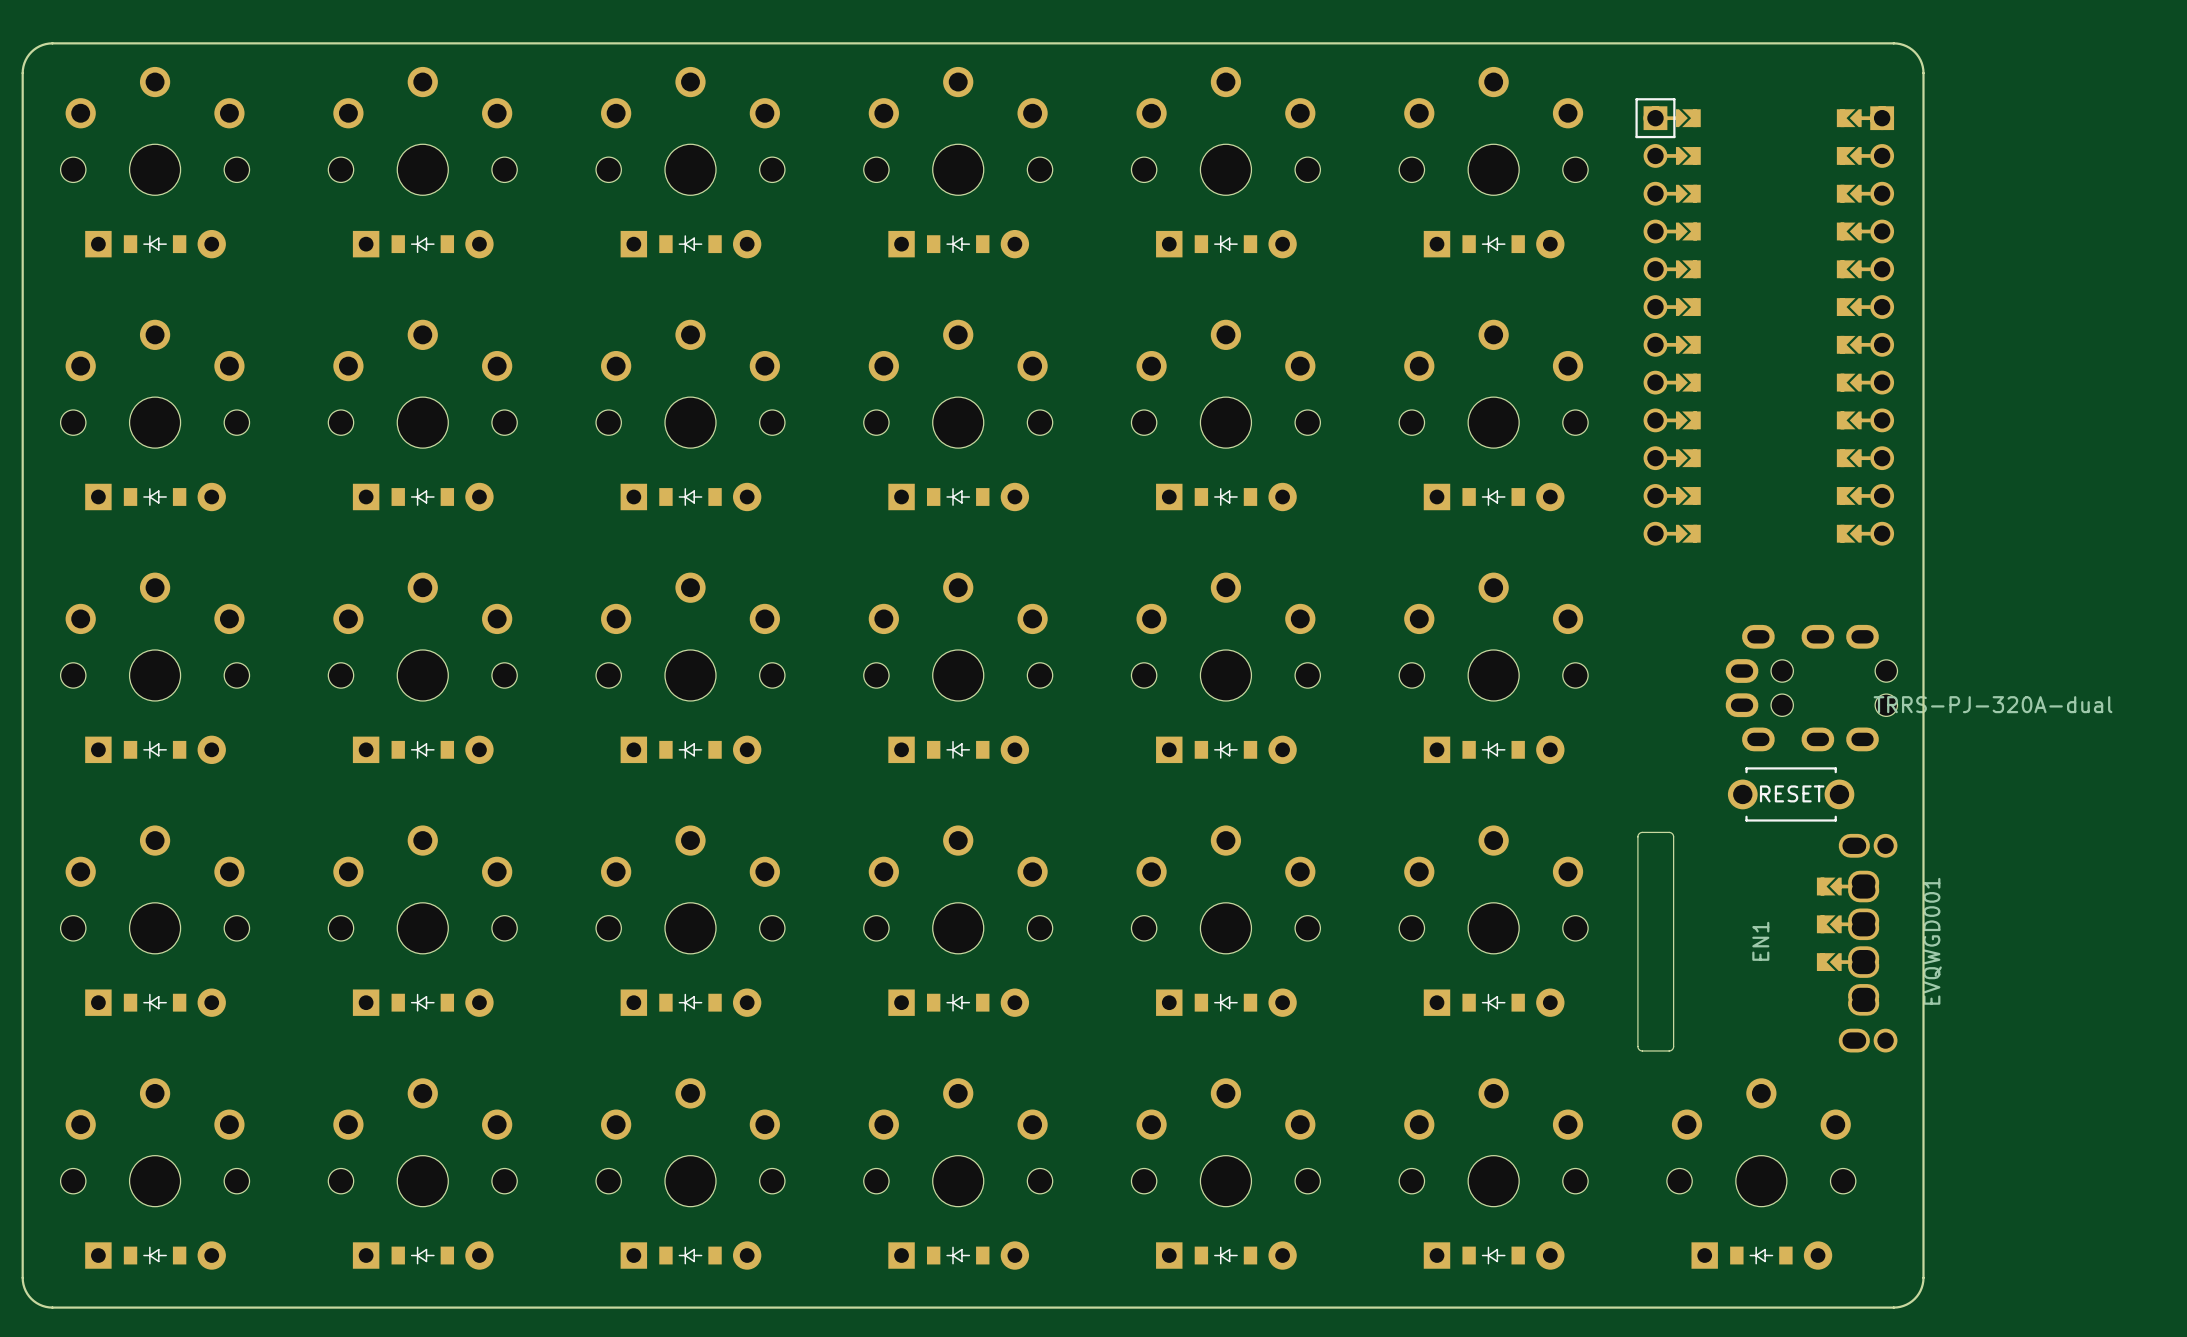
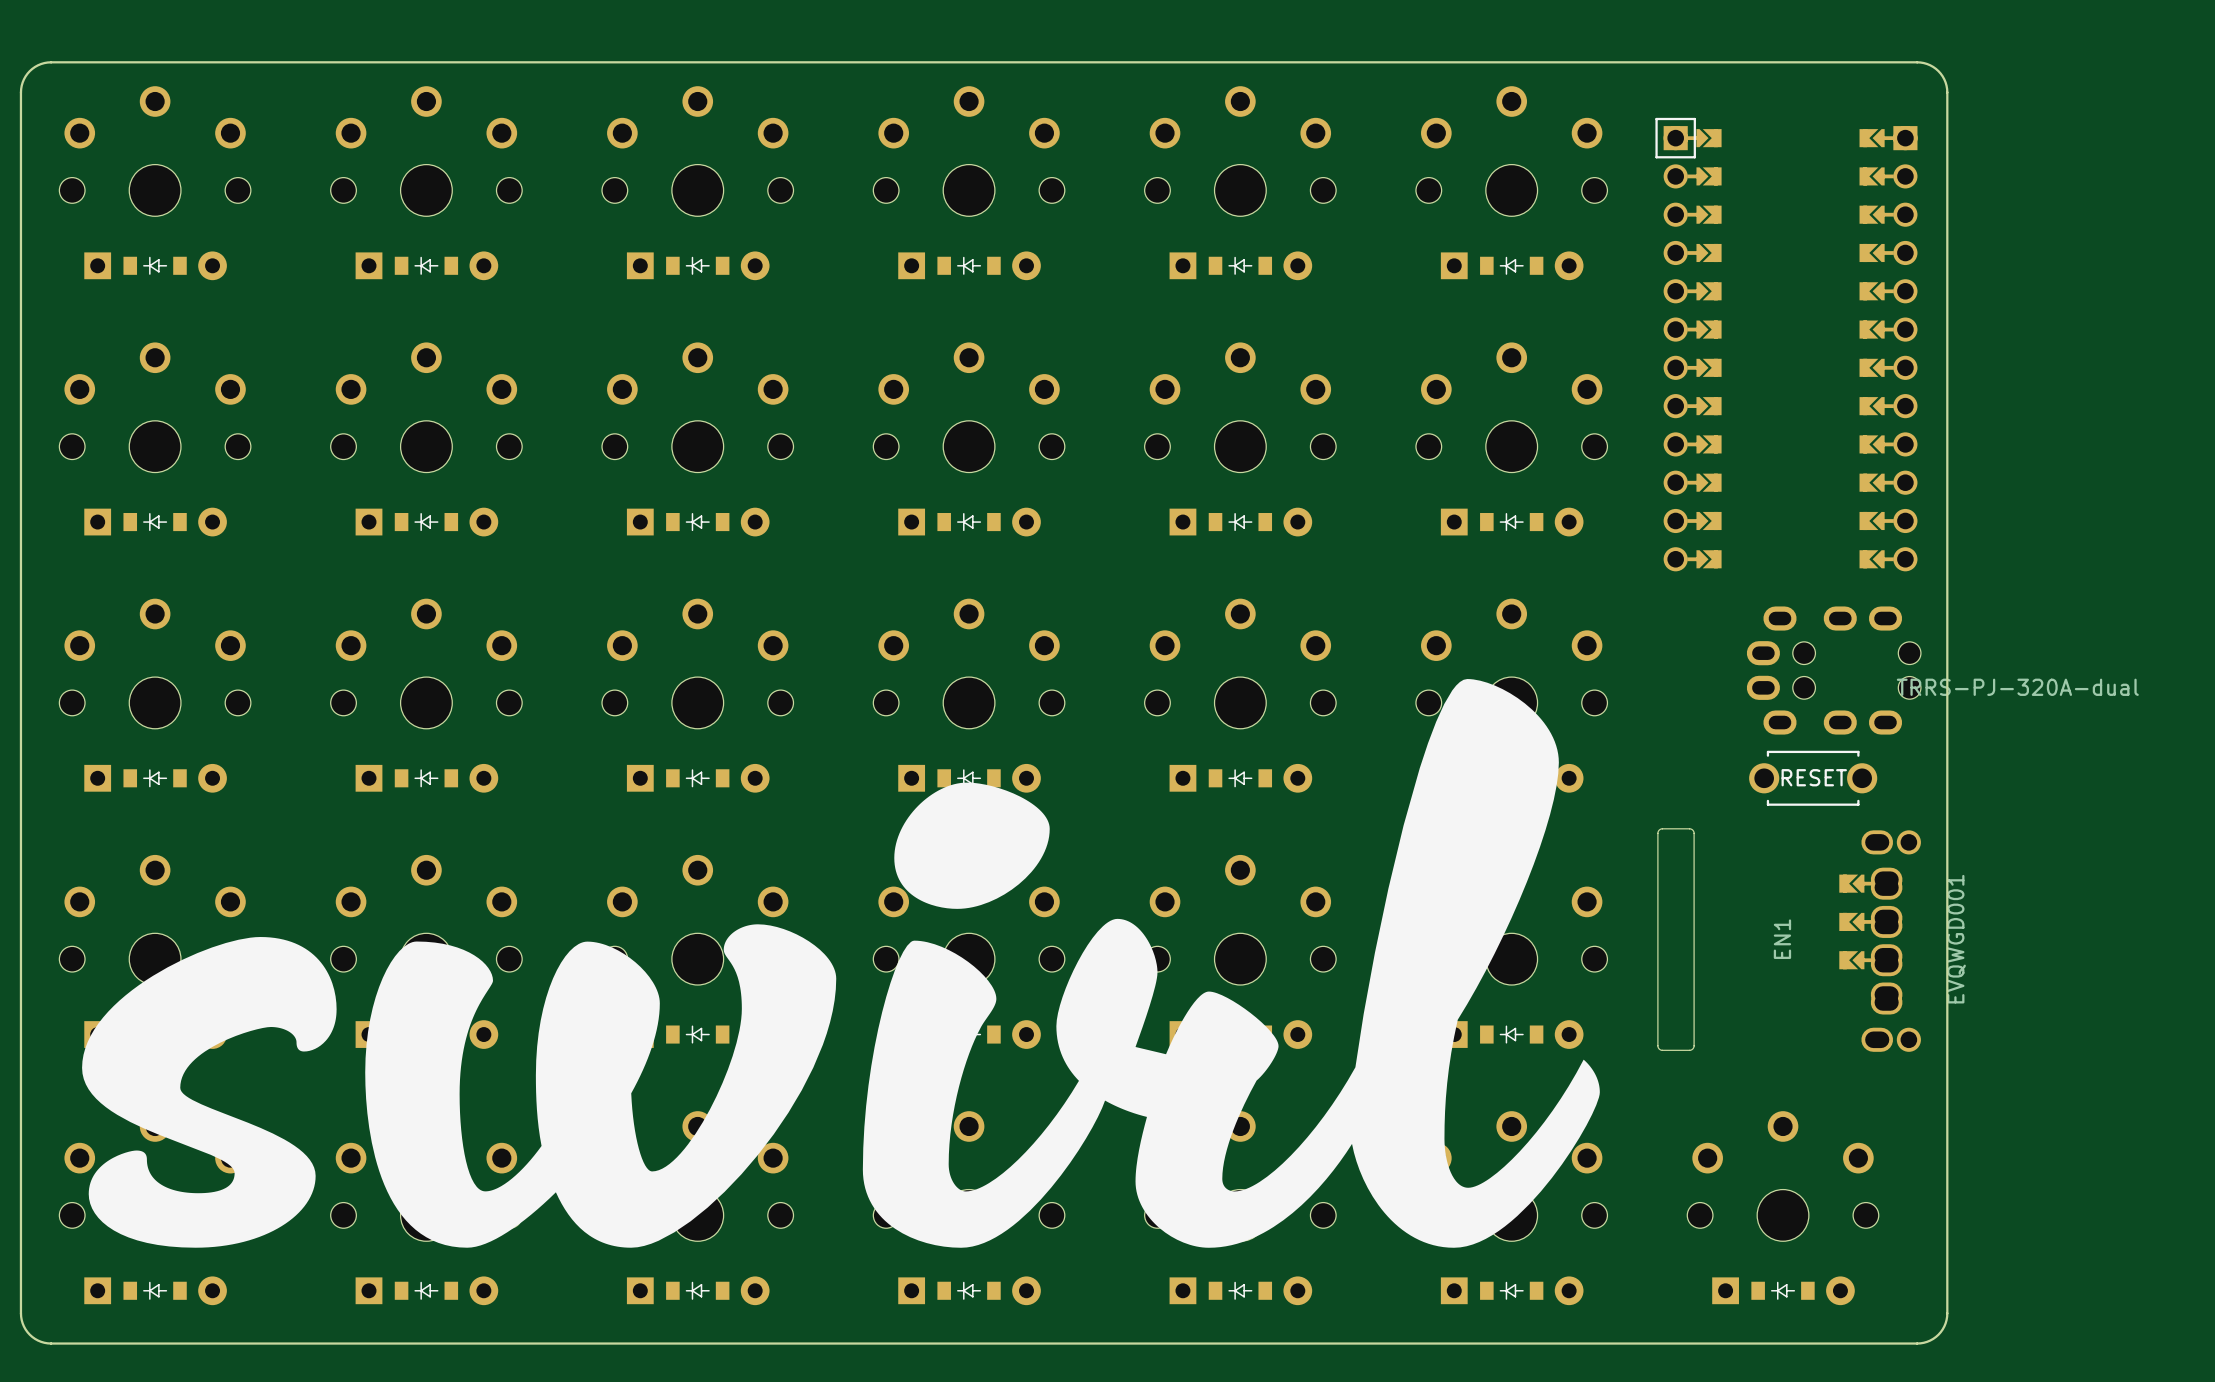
drawing: none -> [862, 679, 1600, 1248]
part position: (1811, 688) -> (1833, 670)
part position: (1791, 794) -> (1813, 778)
drawing: none -> [365, 924, 837, 1248]
drawing: none -> [82, 937, 337, 1248]
EN1 position: (1767, 942) -> (1789, 940)

